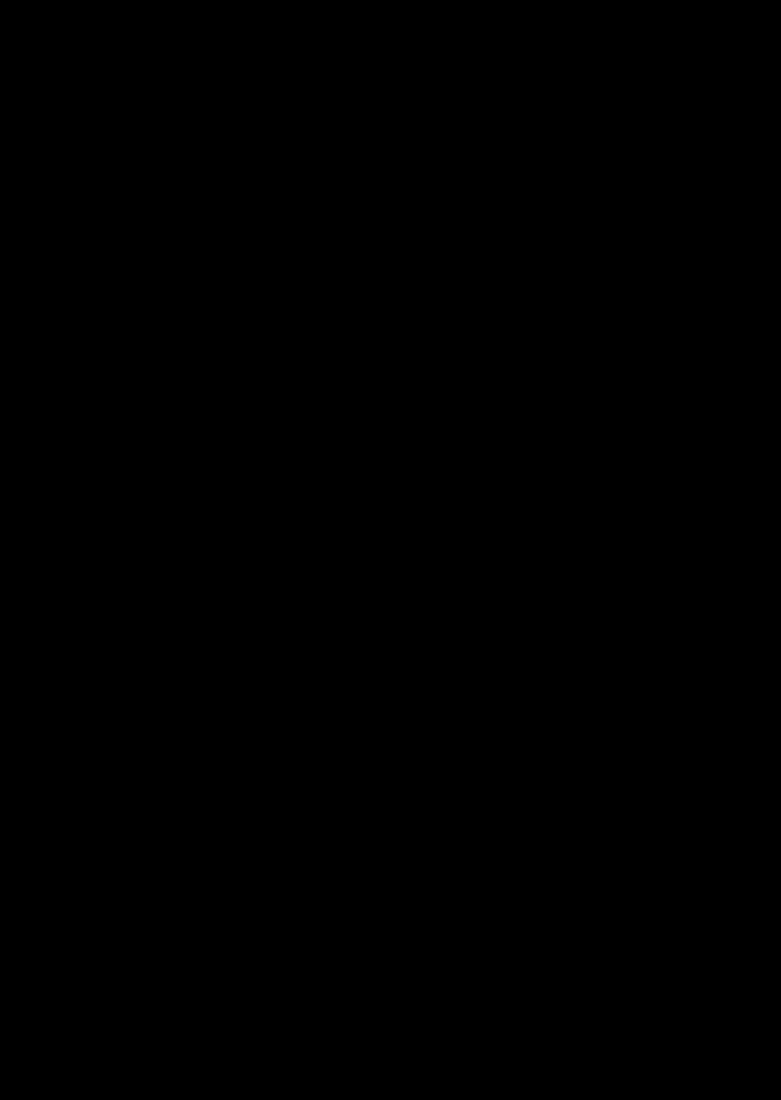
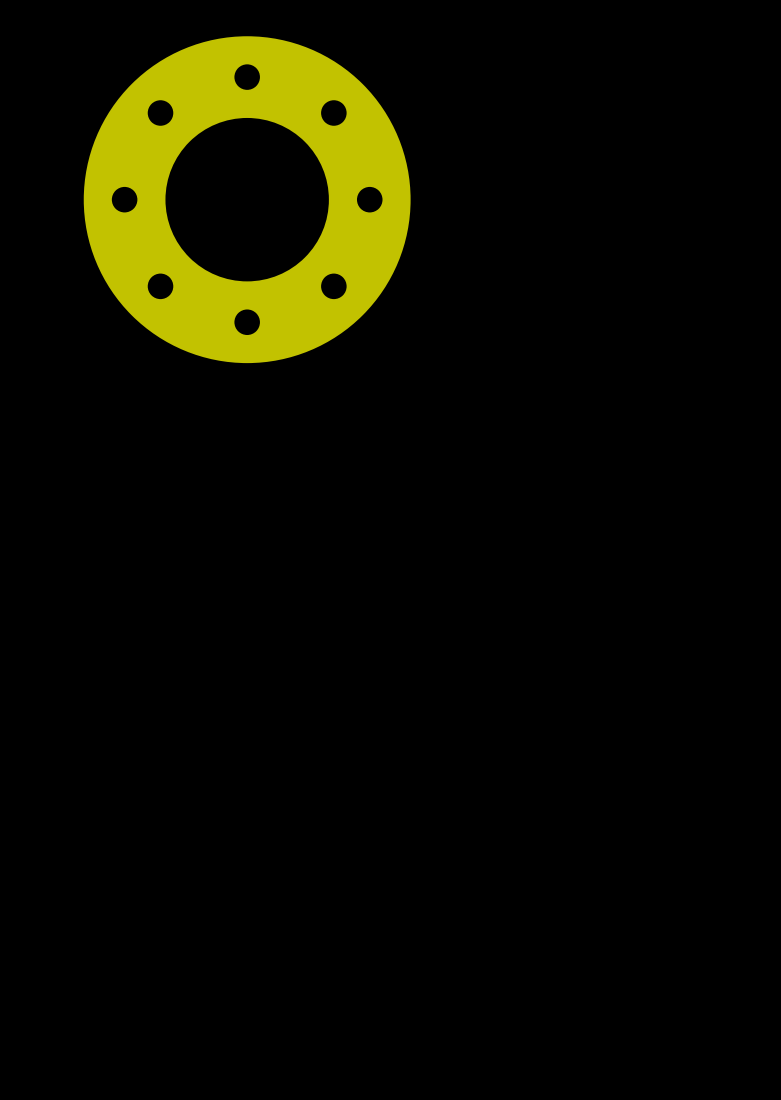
part: none -> (247, 199)

